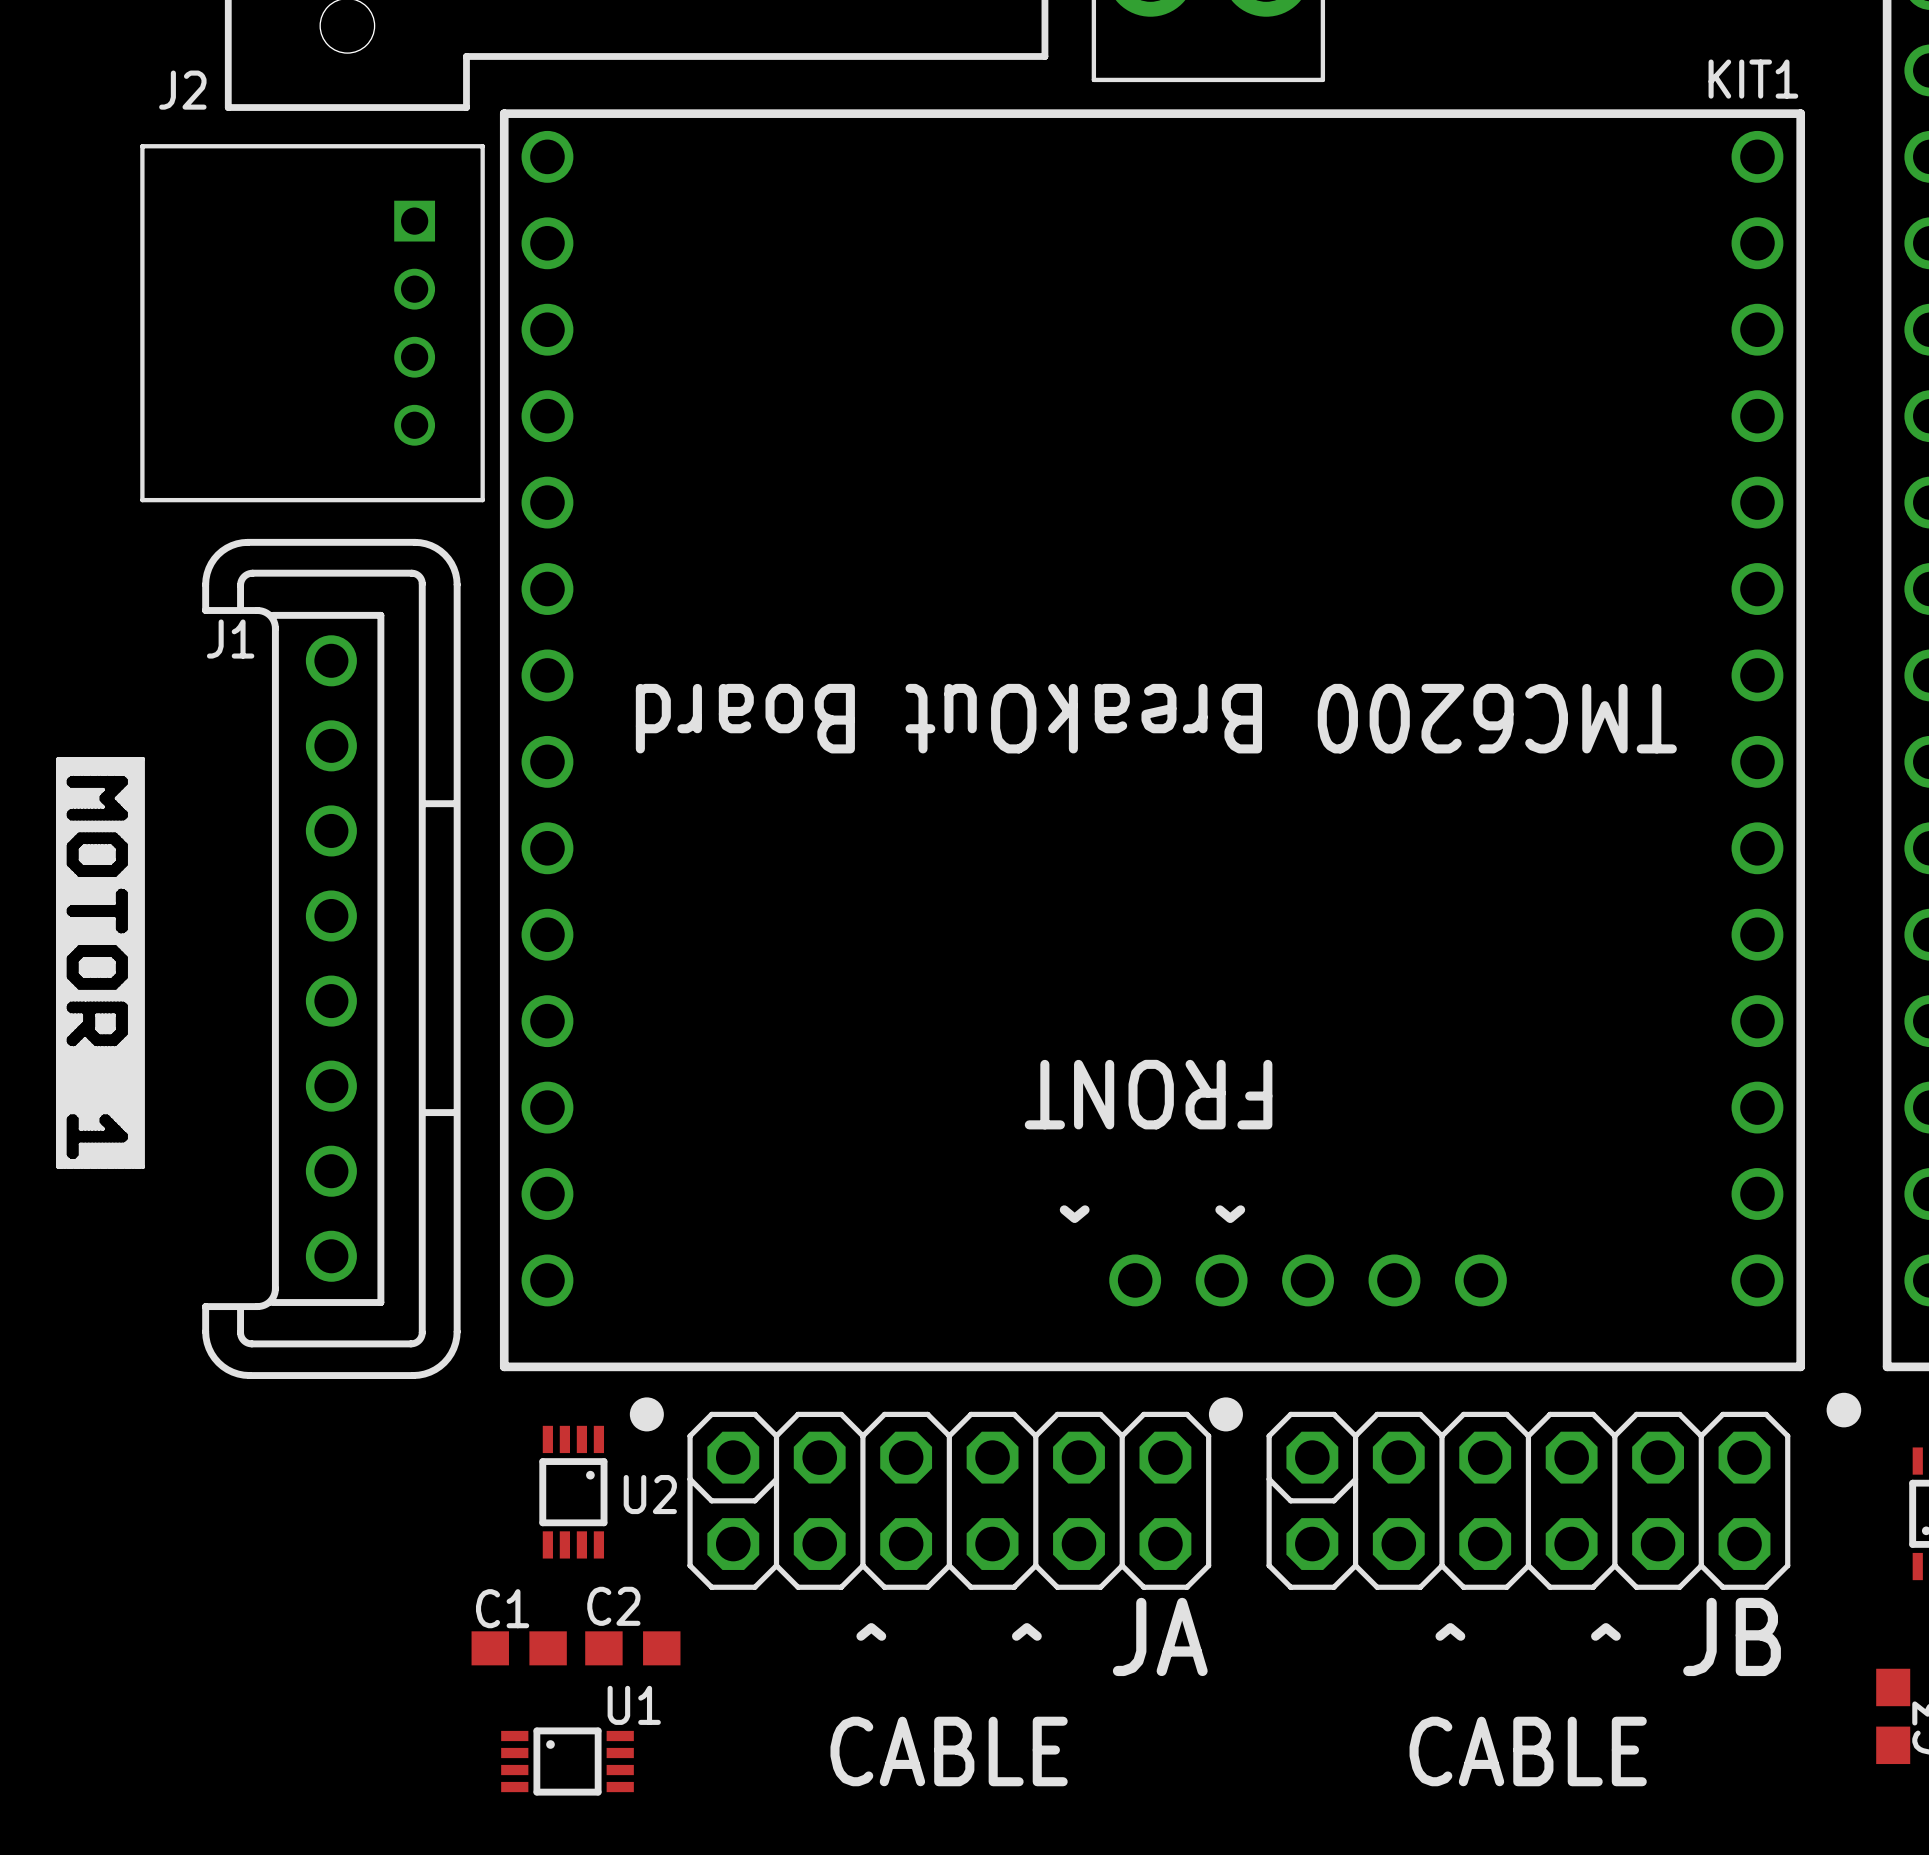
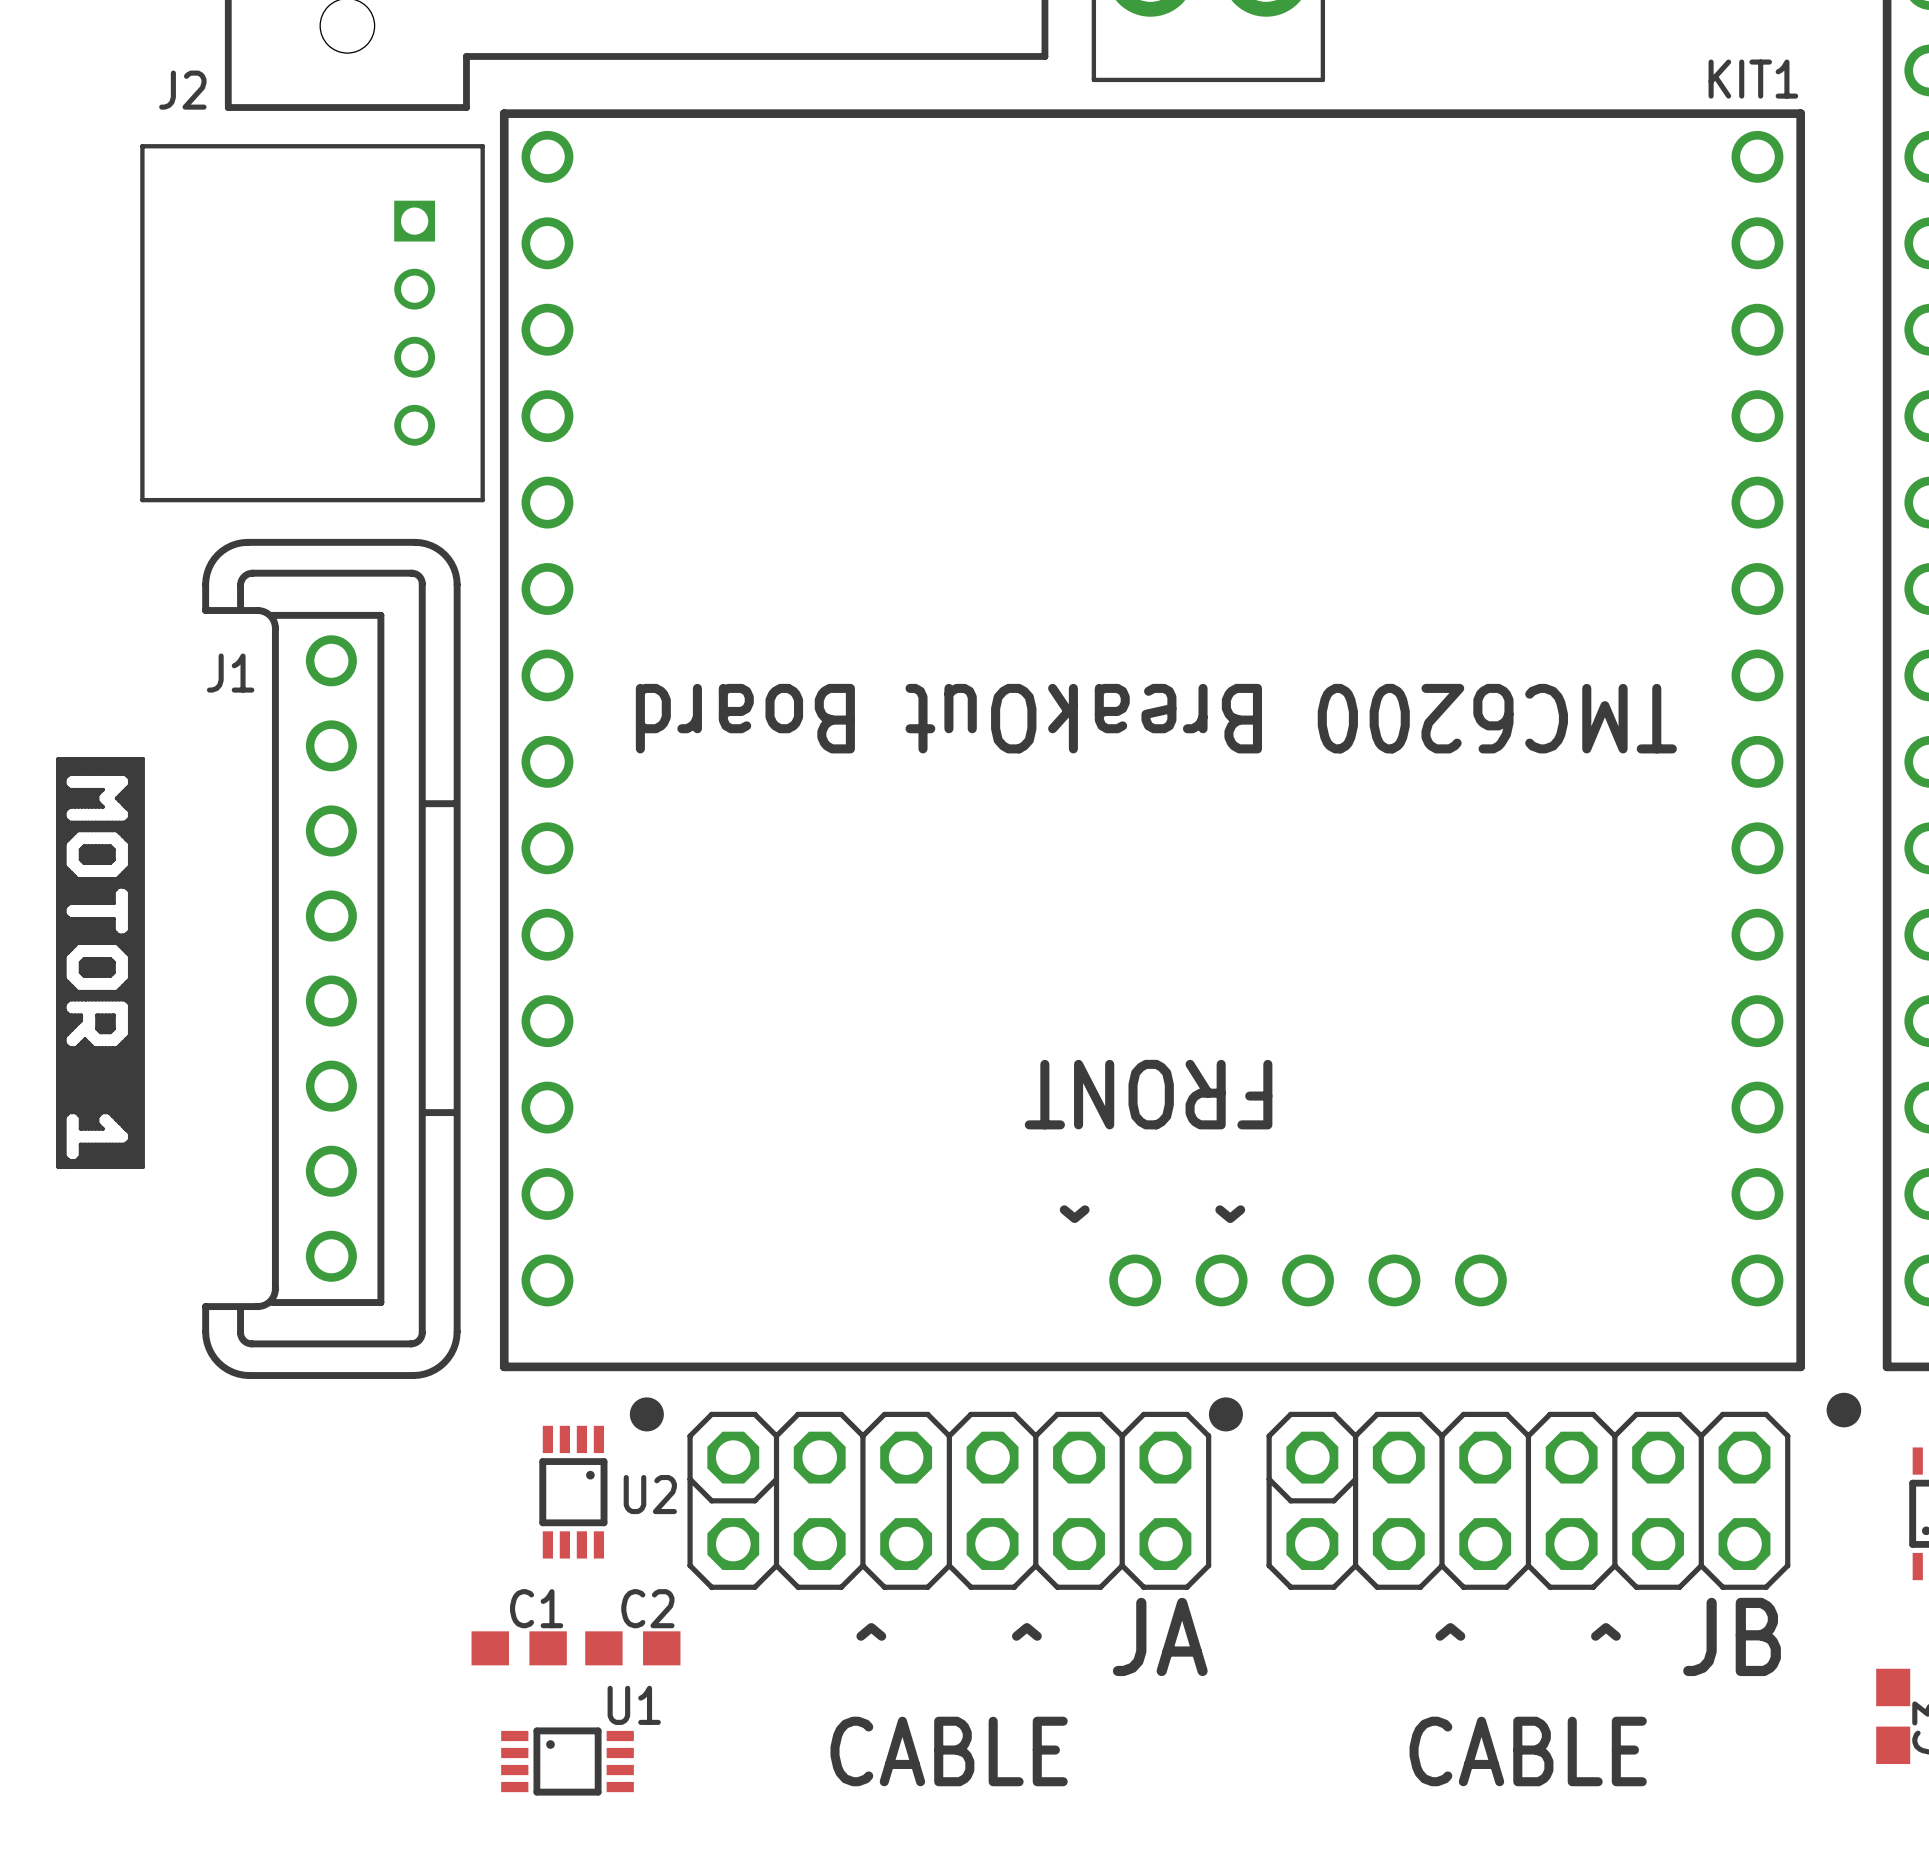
J1 name position: J1 (230, 639) -> J1 (230, 673)
C2 name position: C2 (613, 1606) -> C2 (647, 1608)
C1 name position: C1 (502, 1608) -> C1 (536, 1608)

